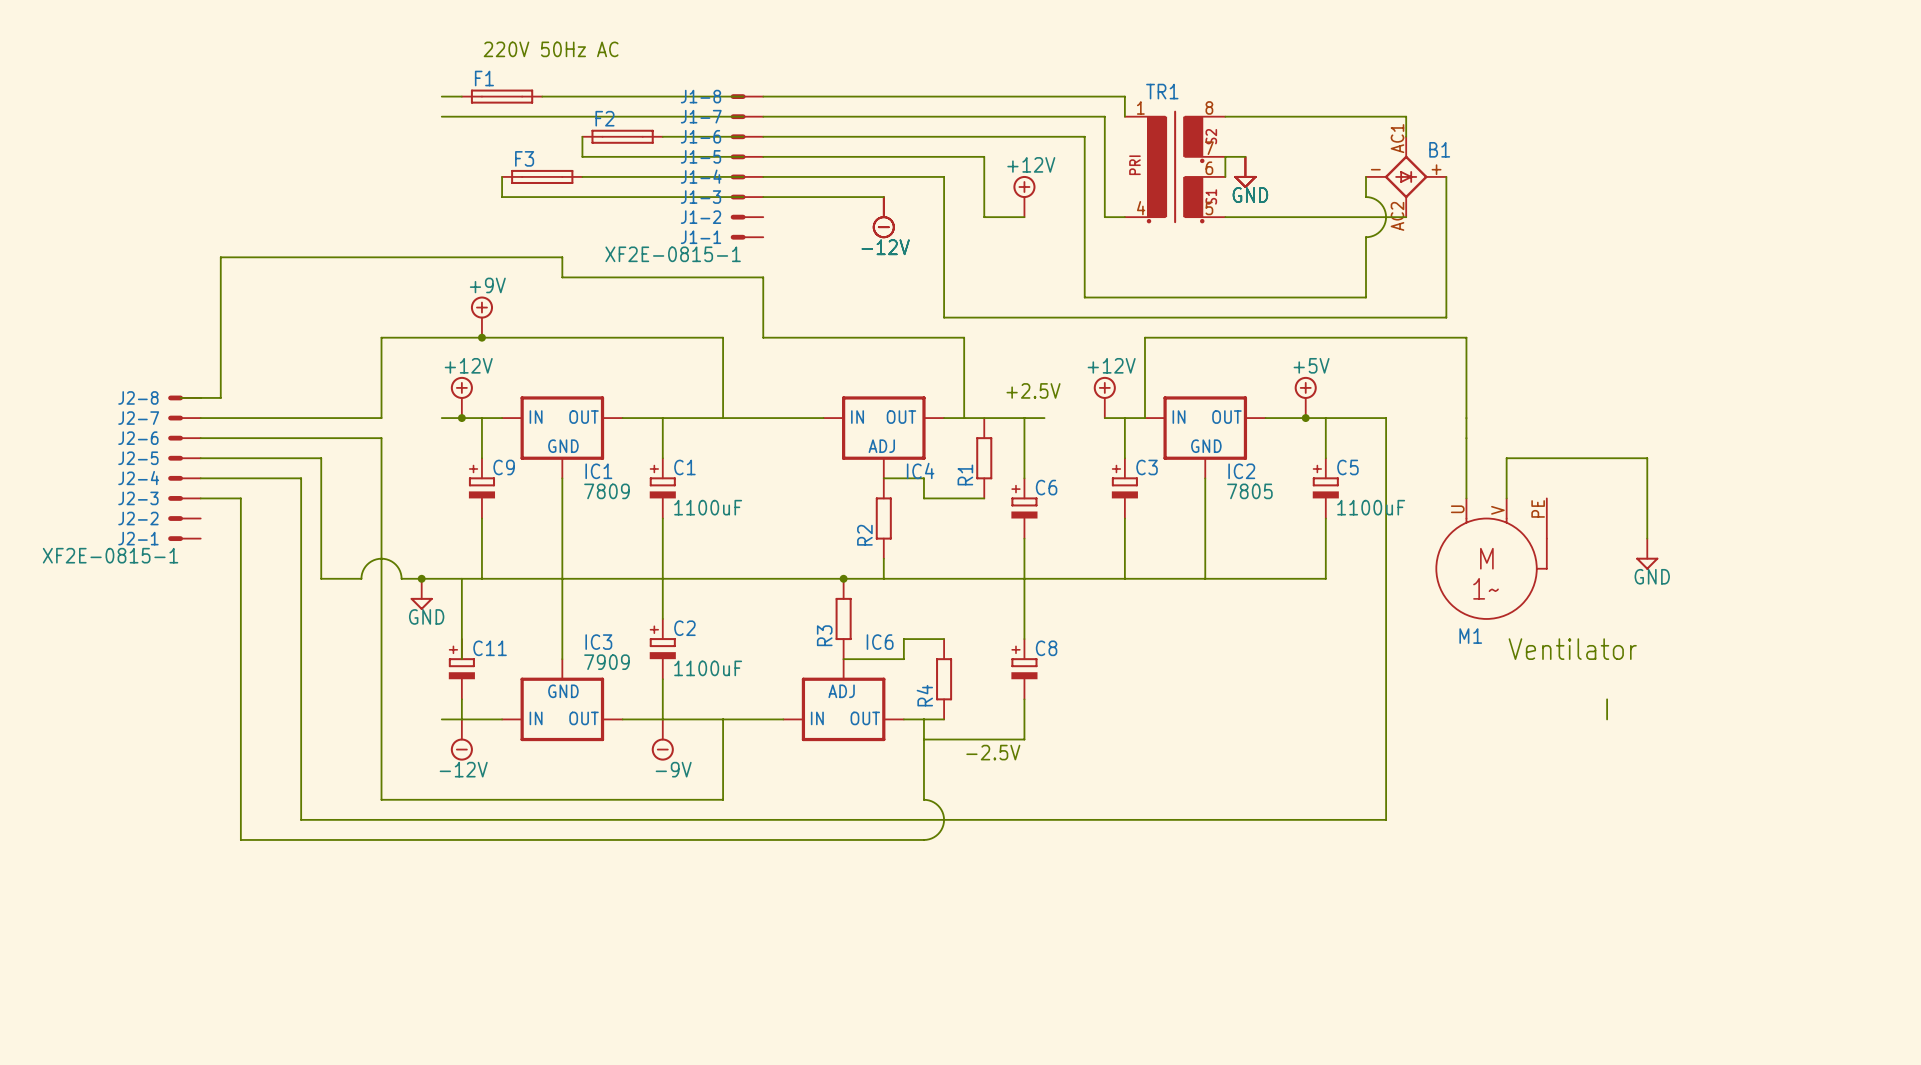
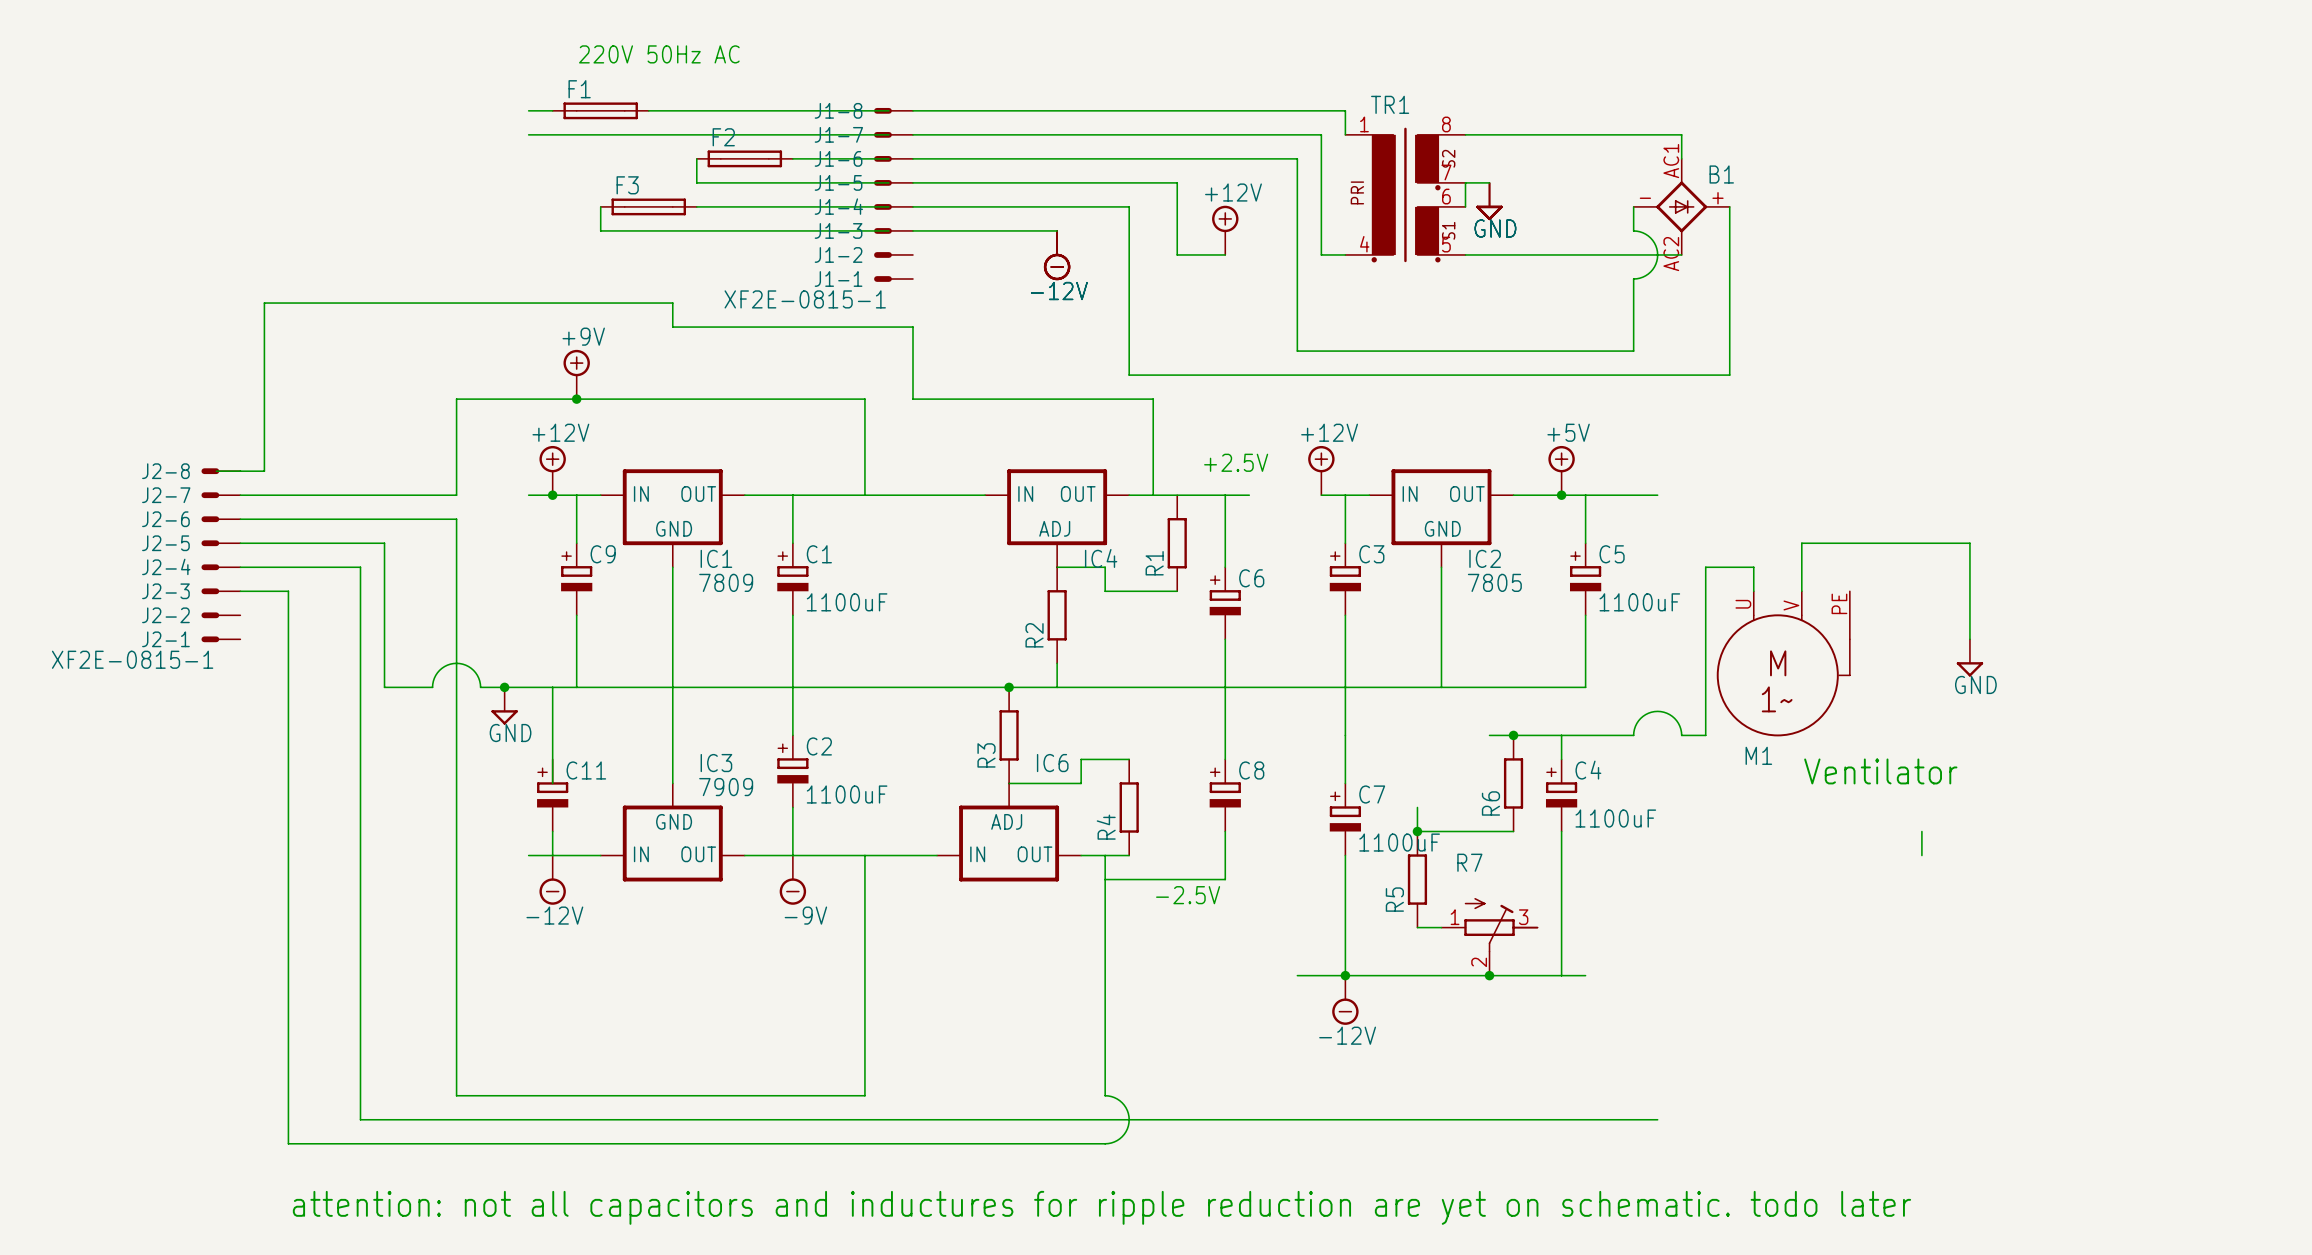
wire: (1144, 418) (1144, 337) (1466, 337) (1466, 478) -> (1489, 735) (1633, 735) (1635, 726) (1640, 718) (1648, 713) (1657, 711) (1666, 713) (1674, 718) (1679, 726) (1681, 735) (1705, 735) (1705, 567) (1753, 567)
wire: (1386, 418) (1386, 819) (1325, 819) -> none
wire: none -> (1345, 687) (1345, 783)
junction: none -> (1513, 735)
wire: none -> (1561, 735) (1561, 759)
R6: none -> (1513, 783)
C4: none -> 1100uF (1561, 795)
wire: none -> (1417, 807) (1417, 831) (1513, 831)
C7: none -> 1100uF (1345, 819)
junction: none -> (1417, 831)
wire: none -> (1561, 831) (1561, 975)
wire: none -> (1345, 855) (1345, 975)
R5: none -> (1417, 879)
wire: none -> (1417, 927) (1441, 927)
R7: none -> (1489, 936)
wire: (381, 799) (723, 799) -> (456, 951) (456, 1095) (864, 1095) (864, 951)
wire: (923, 799) (931, 801) (938, 805) (942, 812) (944, 819) (942, 827) (938, 834) (931, 838) (923, 839) (240, 839) -> (1105, 951) (1105, 1095) (1114, 1097) (1122, 1102) (1127, 1110) (1129, 1119) (1127, 1128) (1122, 1136) (1114, 1141) (1105, 1143) (288, 1143) (288, 999)
wire: (301, 819) (1084, 819) -> (360, 975) (360, 1119) (1657, 1119)
junction: none -> (1345, 975)
junction: none -> (1489, 975)
power symbol: none -> -12V (1345, 1000)
text: none -> attention: not all capacitors and inductures for ripple reduction are yet on schematic. todo later (1101, 1207)

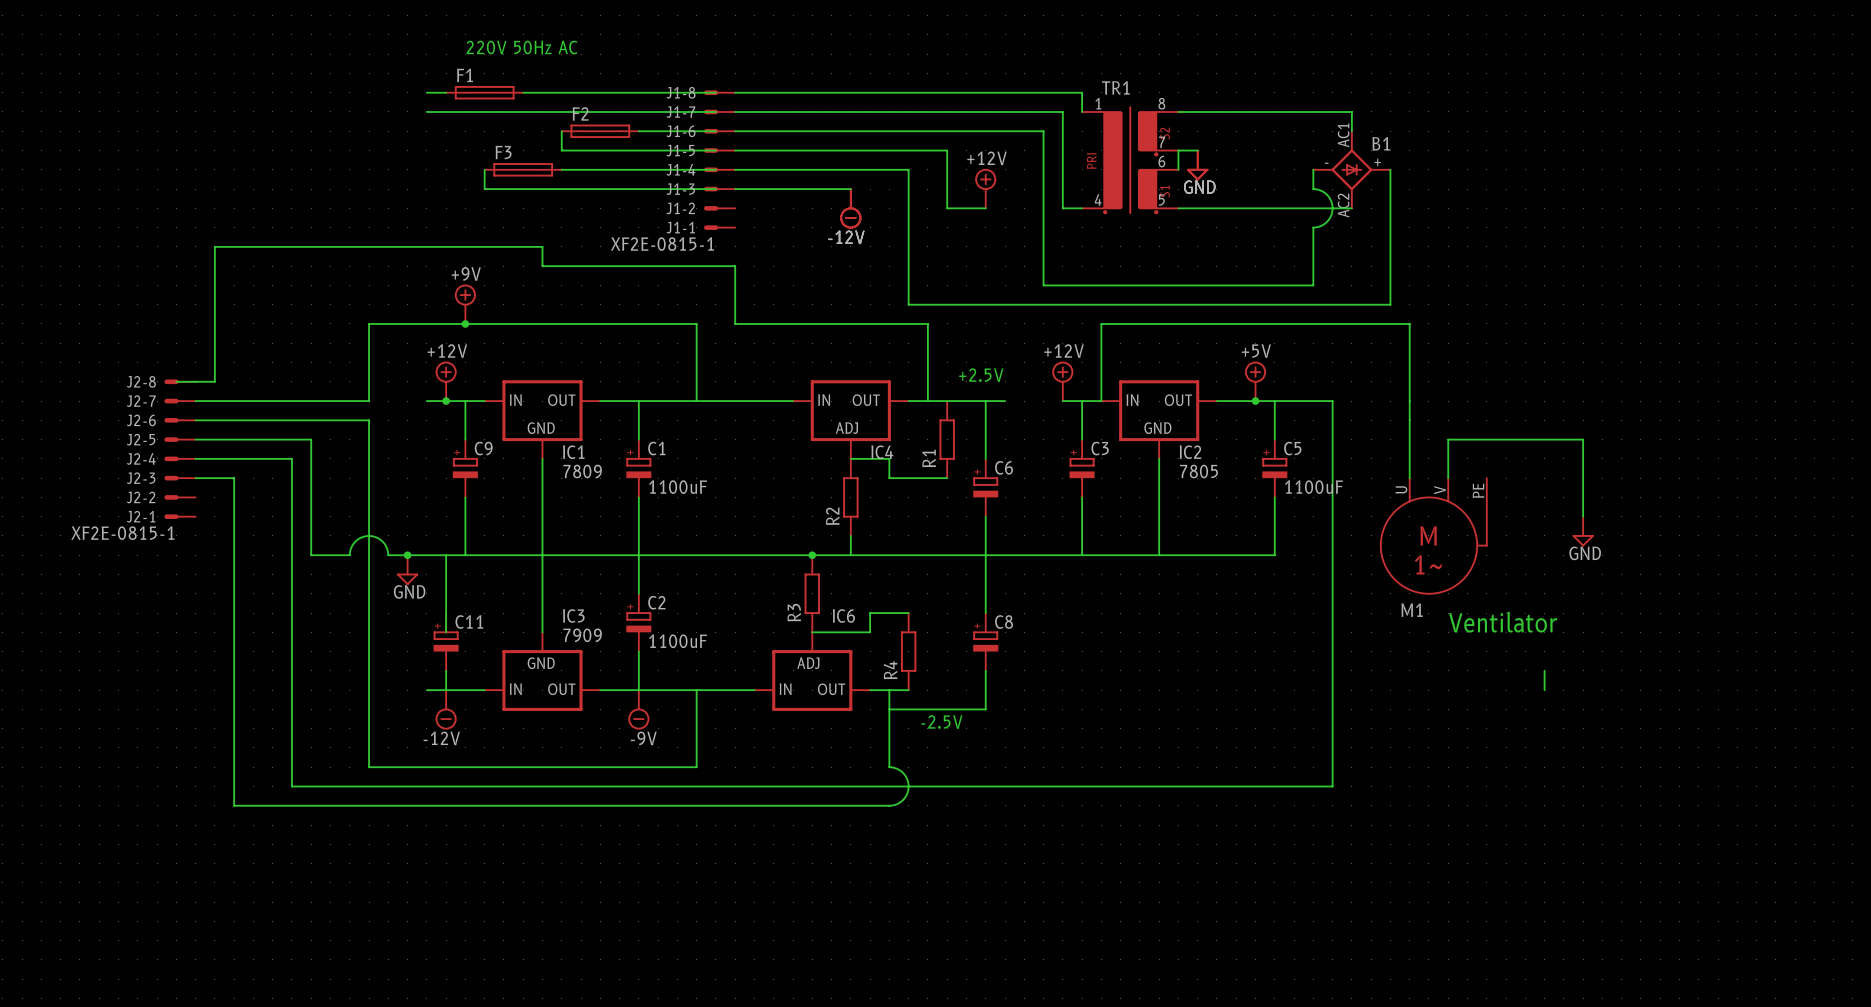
wire: none -> (1332, 401) (1332, 786) (1274, 786)
wire: (1753, 567) (1705, 567) (1705, 735) (1681, 735) (1679, 726) (1674, 718) (1666, 713) (1657, 711) (1648, 713) (1640, 718) (1635, 726) (1633, 735) (1489, 735) -> (1409, 458) (1409, 323) (1101, 323) (1101, 401)
wire: (1345, 687) (1345, 783) -> none
junction: (1513, 735) -> none
wire: (1561, 735) (1561, 759) -> none
R6: (1513, 783) -> none
C4: 1100uF (1561, 795) -> none
wire: (1417, 807) (1417, 831) (1513, 831) -> none
C7: 1100uF (1345, 819) -> none
junction: (1417, 831) -> none
wire: (1561, 831) (1561, 975) -> none
wire: (1345, 855) (1345, 975) -> none
R5: (1417, 879) -> none
wire: (1417, 927) (1441, 927) -> none
R7: (1489, 936) -> none
wire: (456, 951) (456, 1095) (864, 1095) (864, 951) -> (369, 767) (696, 767)
wire: (1105, 951) (1105, 1095) (1114, 1097) (1122, 1102) (1127, 1110) (1129, 1119) (1127, 1128) (1122, 1136) (1114, 1141) (1105, 1143) (288, 1143) (288, 999) -> (889, 767) (903, 772) (908, 786) (903, 800) (889, 805) (234, 805)
wire: (360, 975) (360, 1119) (1657, 1119) -> (291, 786) (1043, 786)
junction: (1345, 975) -> none
junction: (1489, 975) -> none
power symbol: -12V (1345, 1000) -> none
text: attention: not all capacitors and inductures for ripple reduction are yet on schematic. todo later (1101, 1207) -> none

